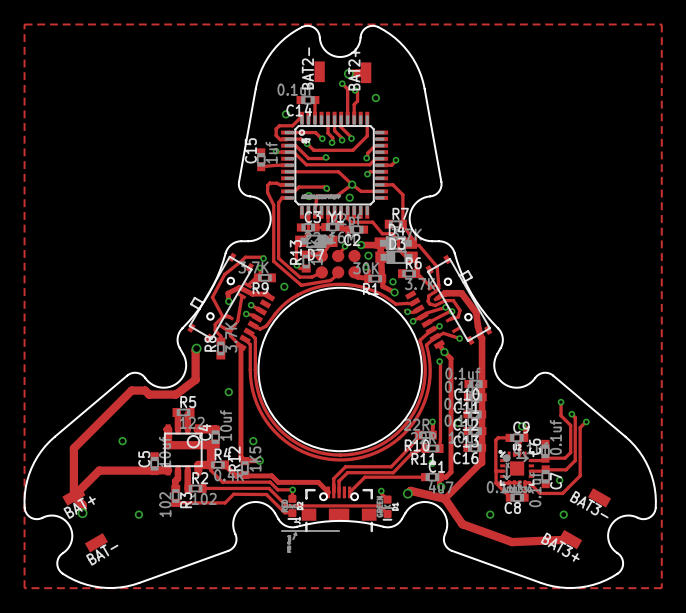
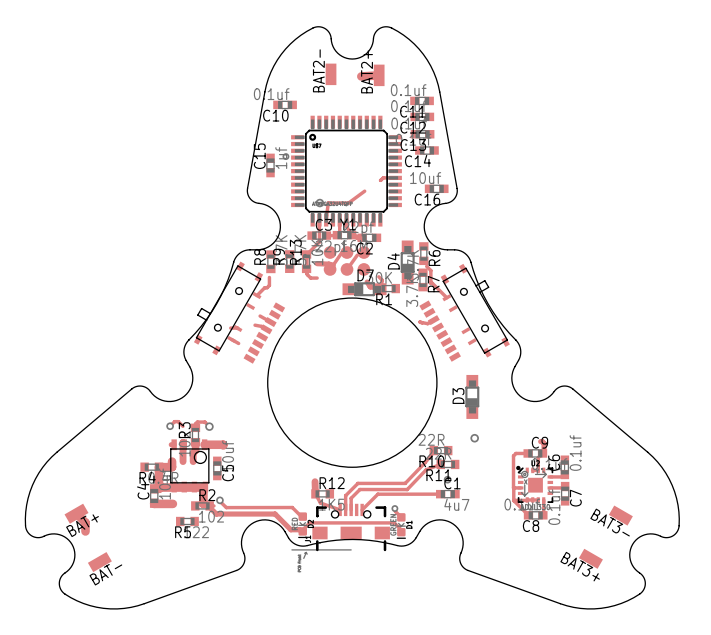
zone outline: (24, 24) (24, 588) (661, 588) (661, 24) (24, 24) -> none
via: (348, 73) -> none
track: (342, 83) (347, 89) (347, 117) -> none
via: (342, 83) -> none
track: (355, 90) (357, 92) (357, 101) (354, 104) (354, 117) -> none
via: (355, 90) -> none
via: (375, 98) -> none
C14 position: (307, 100) -> (426, 150)
track: (314, 100) (314, 117) -> none
via: (285, 114) -> none
track: (301, 117) (292, 125) (279, 125) (276, 129) (276, 135) (280, 139) (300, 139) (313, 150) (352, 150) (367, 136) (367, 117) -> none
track: (328, 117) (328, 133) (332, 137) (332, 142) -> none
track: (334, 117) (334, 130) (342, 140) -> none
track: (341, 117) (341, 127) (351, 137) -> none
track: (287, 132) (315, 132) (322, 138) -> none
via: (322, 138) -> none
via: (351, 138) -> none
via: (342, 140) -> none
via: (332, 142) -> none
via: (307, 143) -> none
track: (287, 145) (295, 145) (308, 158) (327, 158) (326, 157) -> none
track: (381, 145) (375, 145) (367, 153) (366, 158) -> none
track: (276, 151) (293, 152) (306, 164) (369, 164) (375, 158) (381, 158) -> none
via: (326, 157) -> none
via: (366, 158) -> none
track: (396, 160) (391, 165) (381, 165) -> none
via: (396, 160) -> none
track: (287, 165) (261, 166) -> none
track: (287, 171) (338, 171) (361, 191) (381, 191) -> none
via: (367, 174) -> none
track: (282, 184) (269, 183) (267, 185) (267, 192) (273, 205) (273, 261) (301, 285) (330, 280) (338, 272) -> none
via: (352, 184) -> none
track: (381, 184) (392, 184) (402, 194) (402, 224) (411, 237) (411, 243) (413, 245) (419, 245) (437, 266) (438, 288) (428, 295) (428, 301) (435, 305) (445, 300) (453, 300) (459, 310) (458, 316) (449, 319) -> none
track: (325, 188) (328, 189) (324, 187) (299, 187) (294, 191) (287, 191) -> none
via: (326, 188) -> none
track: (287, 197) (282, 197) (278, 202) (278, 258) (299, 277) (311, 277) (321, 272) -> none
via: (349, 197) -> none
track: (347, 212) (347, 218) (351, 222) (372, 222) (382, 233) (391, 233) (398, 240) (398, 249) (407, 258) (410, 258) -> none
R7 rotation: 0° (395, 224) -> 90° clockwise (422, 279)
R7 position: (395, 224) -> (422, 279)
D7 rotation: 0° (316, 241) -> 180° (364, 289)
D7 position: (316, 241) -> (364, 289)
D4 rotation: 0° (395, 243) -> 90° counterclockwise (407, 262)
track: (361, 245) (377, 245) (380, 243) (382, 286) (394, 292) -> none
via: (361, 245) -> none
via: (345, 246) -> none
via: (368, 255) -> none
D3 rotation: 0° (396, 257) -> 90° counterclockwise (472, 396)
D3 position: (396, 257) -> (472, 396)
track: (263, 258) (264, 257) (245, 257) (224, 274) (212, 297) (222, 316) (215, 324) (215, 330) (220, 336) (220, 341) -> none
via: (263, 258) -> none
R13 position: (306, 261) -> (306, 261)
part position: (338, 264) -> (347, 260)
via: (296, 265) -> none
via: (260, 267) -> none
via: (365, 267) -> none
R6 rotation: 0° (409, 273) -> 90° clockwise (423, 253)
R6 position: (409, 273) -> (423, 253)
R9 rotation: 0° (264, 277) -> 90° clockwise (289, 261)
R9 position: (264, 277) -> (289, 261)
via: (393, 281) -> none
via: (284, 286) -> none
via: (394, 292) -> none
track: (242, 295) (237, 321) (230, 331) (230, 335) (240, 346) (240, 457) (244, 461) (259, 460) -> none
track: (269, 296) (266, 294) (252, 294) (239, 287) (227, 293) (228, 301) -> none
track: (437, 298) (445, 293) (461, 293) (476, 312) (482, 338) (482, 463) (444, 498) -> none
via: (228, 301) -> none
track: (414, 302) (395, 304) (379, 293) (360, 286) (328, 285) (309, 289) (293, 297) (281, 306) (266, 326) (260, 329) (253, 325) -> none
via: (251, 305) -> none
track: (445, 307) (427, 312) (413, 321) -> none
via: (445, 307) -> none
via: (407, 311) -> none
track: (452, 311) (427, 323) -> none
via: (452, 311) -> none
via: (246, 314) -> none
via: (413, 321) -> none
track: (439, 326) (431, 330) (420, 340) (424, 361) (424, 381) (419, 401) (405, 424) (396, 434) (379, 445) (360, 452) (340, 455) (320, 452) (301, 445) (285, 434) (271, 420) (261, 402) (257, 389) (255, 338) (249, 332) -> none
via: (439, 326) -> none
track: (459, 338) (443, 333) (426, 345) (430, 370) (428, 389) (419, 413) (404, 433) (388, 446) (376, 452) (356, 458) (342, 459) (322, 458) (302, 451) (285, 441) (270, 426) (262, 415) (254, 396) (250, 376) (250, 344) (245, 339) -> none
via: (459, 338) -> none
track: (439, 344) (451, 358) (451, 472) (446, 477) (439, 477) (441, 486) -> none
track: (196, 348) (195, 379) (175, 394) (149, 394) (145, 390) (131, 390) (73, 448) (73, 496) (99, 470) (168, 470) -> none
via: (196, 348) -> none
R8 position: (220, 348) -> (270, 261)
via: (444, 352) -> none
track: (439, 361) (439, 448) -> none
via: (439, 361) -> none
C10 position: (475, 384) -> (285, 104)
via: (228, 392) -> none
C11 position: (475, 397) -> (422, 100)
R5 name position: R5 (188, 402) -> R5 (183, 532)
track: (561, 402) (561, 415) (570, 425) (570, 452) (565, 458) (545, 458) -> none
via: (561, 402) -> none
track: none -> (170, 426) (174, 421) (178, 421) (182, 426)
via: none -> (170, 426)
track: none -> (209, 426) (204, 422) (197, 422) (195, 427)
via: none -> (209, 426)
track: (176, 412) (177, 429) -> none
R5 position: (183, 412) -> (187, 521)
track: (190, 412) (187, 414) (187, 429) -> none
C12 position: (474, 414) -> (422, 116)
track: (571, 414) (575, 417) (575, 460) (566, 469) (545, 469) -> none
via: (571, 414) -> none
track: (432, 421) (432, 435) -> none
via: (432, 421) -> none
track: (586, 421) (580, 427) (580, 475) (562, 493) (540, 493) (529, 482) (525, 482) -> none
via: (586, 421) -> none
via: (522, 426) -> none
track: none -> (183, 442) (183, 461)
track: none -> (195, 442) (193, 461)
track: (168, 429) (168, 445) (210, 445) -> none
C13 position: (475, 431) -> (422, 134)
C4 position: (215, 437) -> (154, 496)
via: (122, 441) -> none
via: (253, 441) -> none
track: (215, 443) (210, 443) (210, 464) (198, 464) (198, 470) -> none
track: none -> (172, 461) (172, 467) (159, 467) (159, 488) (154, 488)
C16 position: (474, 447) -> (436, 188)
R4 name position: R4 (222, 454) -> R4 (147, 477)
C5 name position: C5 (144, 459) -> C5 (228, 473)
via: (259, 460) -> none
C5 position: (154, 463) -> (217, 468)
track: (210, 464) (210, 470) (222, 482) (270, 482) (277, 489) (292, 489) (292, 498) -> none
R4 position: (217, 464) -> (151, 467)
track: (224, 464) (236, 476) (271, 475) (278, 482) (318, 482) (328, 492) -> (315, 481) (315, 493) (320, 503) (340, 509)
R12 rotation: 0° (244, 468) -> 90° clockwise (322, 493)
R12 position: (244, 468) -> (322, 493)
track: none -> (159, 487) (203, 487) (203, 503)
track: (177, 470) (175, 489) -> none
track: (187, 470) (188, 488) -> none
via: (559, 480) -> none
track: none -> (219, 500) (226, 507) (292, 507) (300, 515)
via: none -> (219, 500)
track: none -> (154, 503) (172, 503)
track: none -> (203, 503) (206, 503) (216, 514) (275, 514) (290, 529) (302, 530) (309, 522) (394, 522) (401, 530)
via: (441, 486) -> none
track: (206, 488) (269, 488) (286, 505) (379, 505) (387, 513) -> none
via: (292, 489) -> none
track: (407, 493) (410, 490) (444, 498) -> none
via: (407, 493) -> none
R3 position: (175, 495) -> (195, 435)
track: (444, 498) (462, 524) (512, 542) (570, 539) -> none
R3 name position: R3 (186, 500) -> R3 (184, 430)
track: (175, 502) (225, 502) (233, 494) (266, 494) (284, 512) (292, 513) -> none
via: (82, 513) -> none
via: (138, 514) -> none
via: (490, 514) -> none
via: (563, 514) -> none

